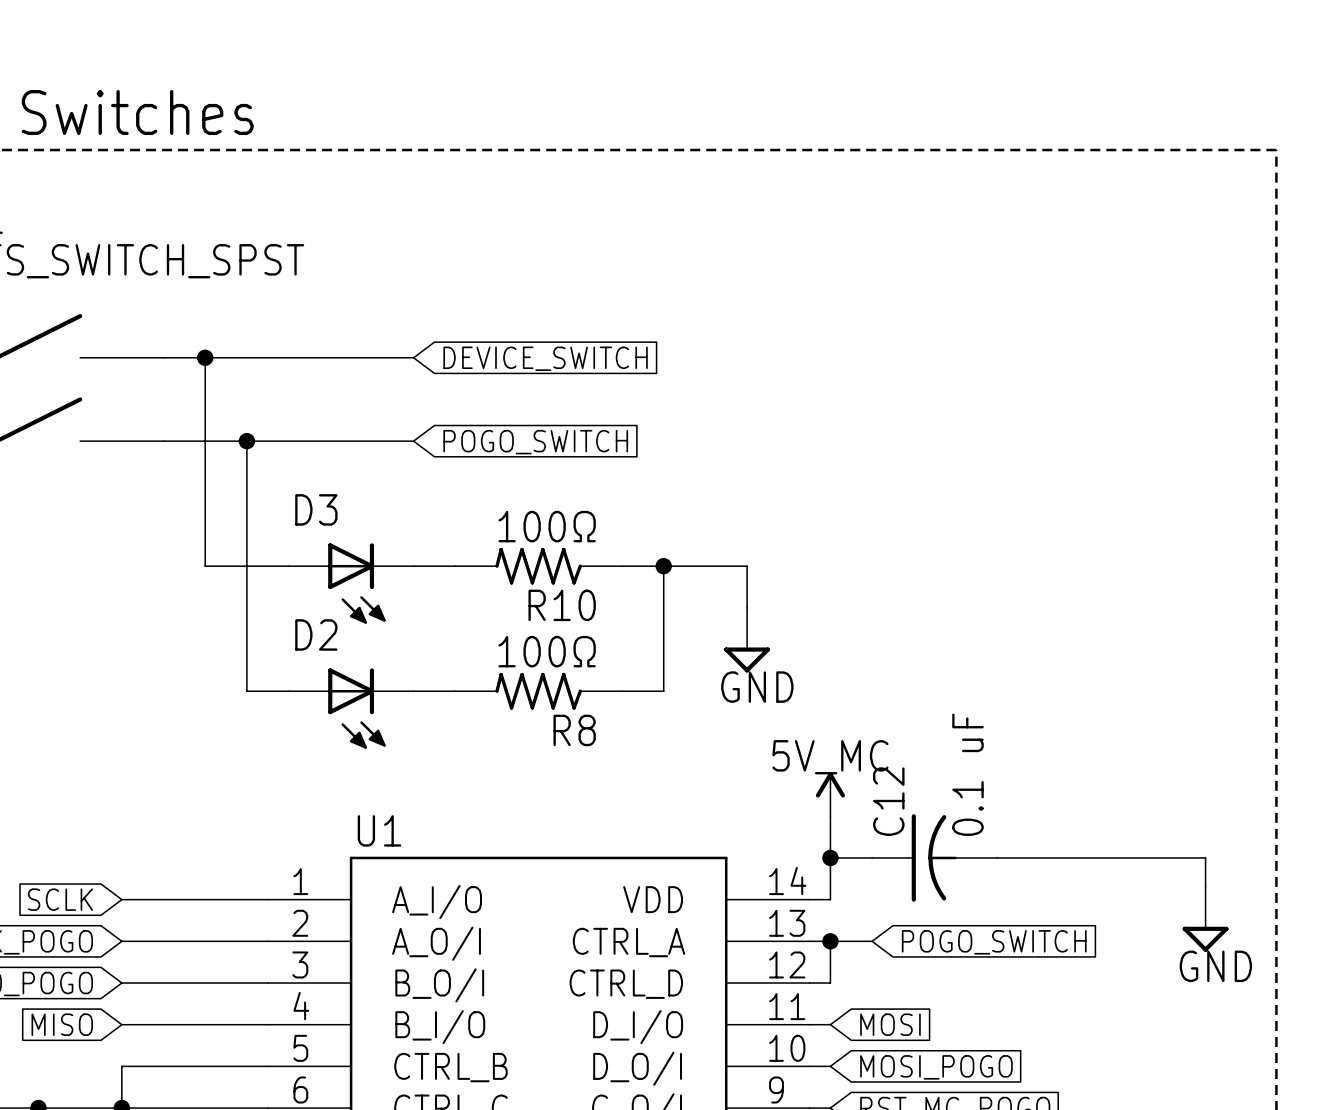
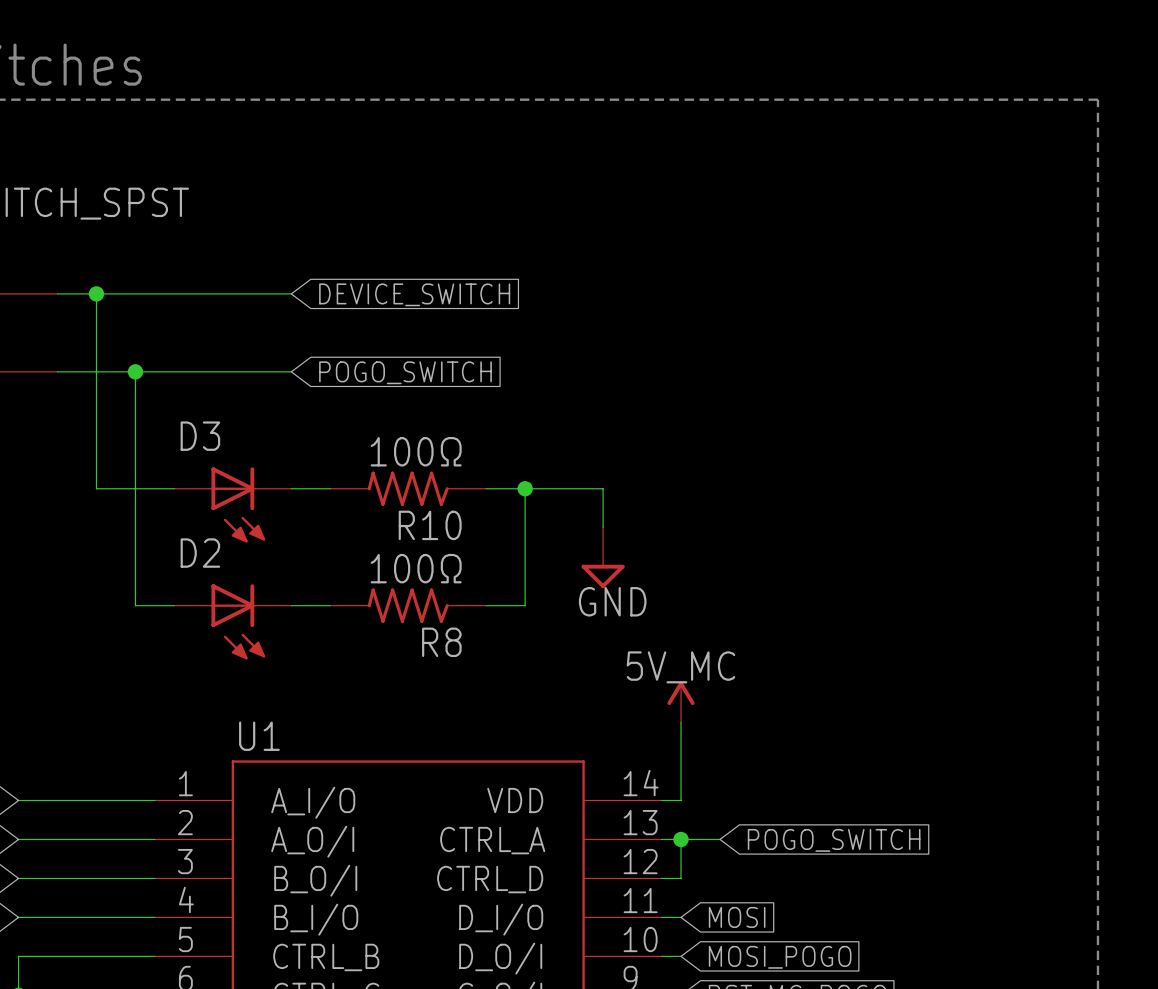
wire: (830, 857) (872, 857) -> none
junction: (830, 857) -> none
C12: 0.1 uF (934, 857) -> none
wire: (997, 857) (1205, 857) (1205, 887) -> none
power symbol: GND (1205, 919) -> none

